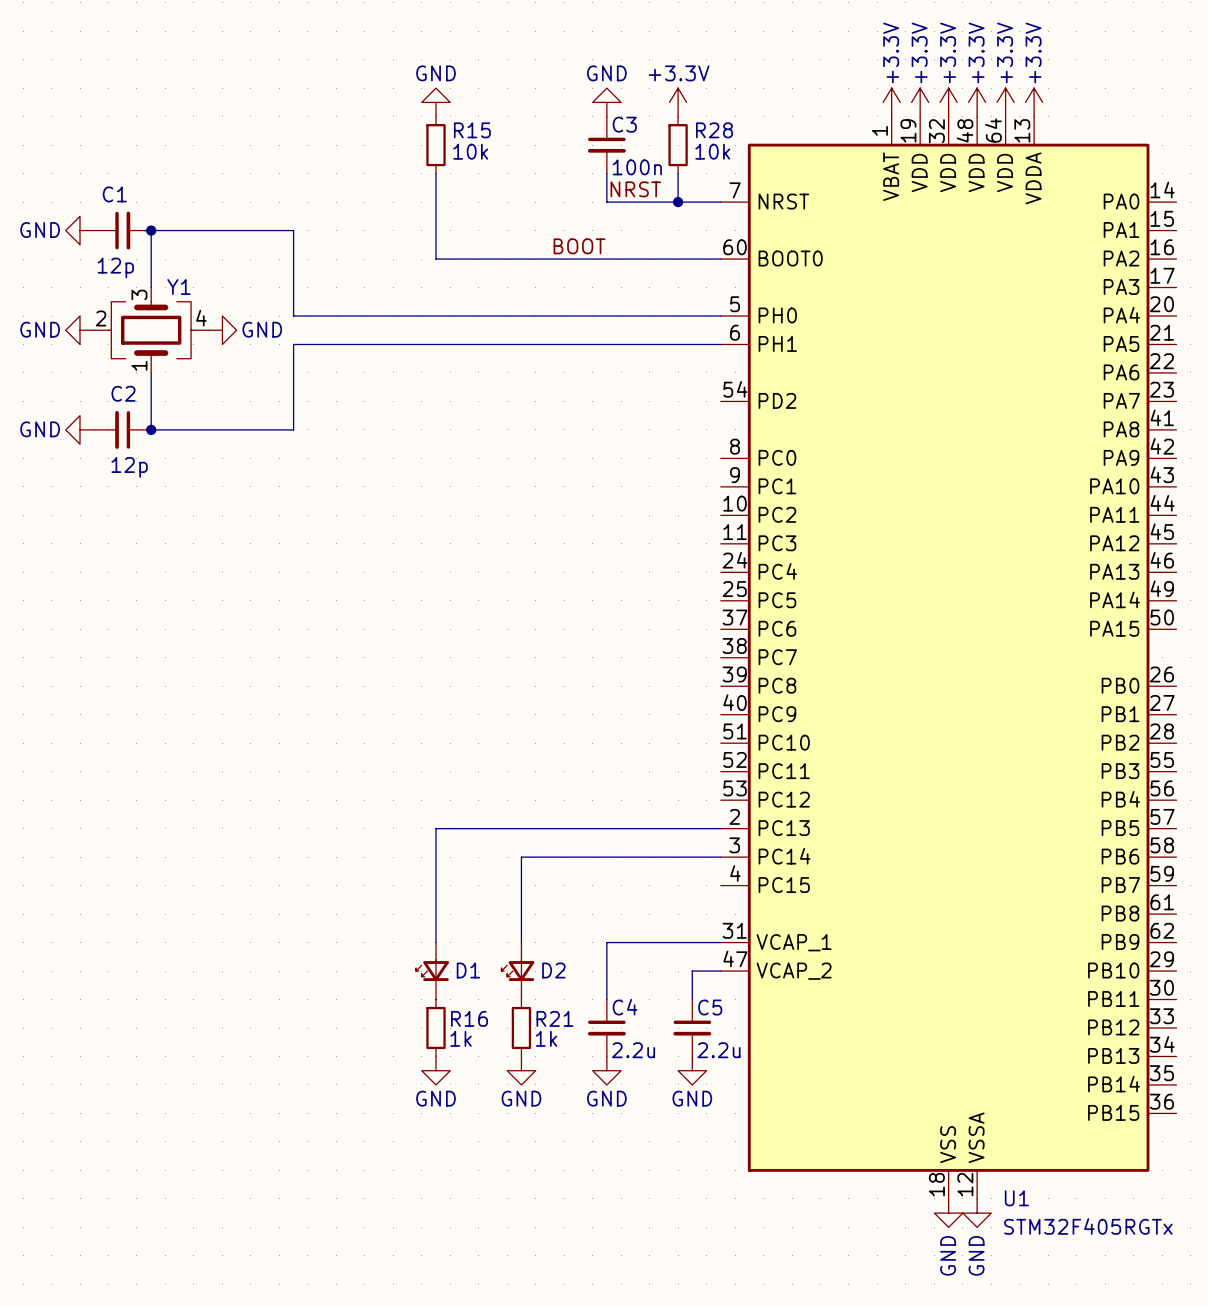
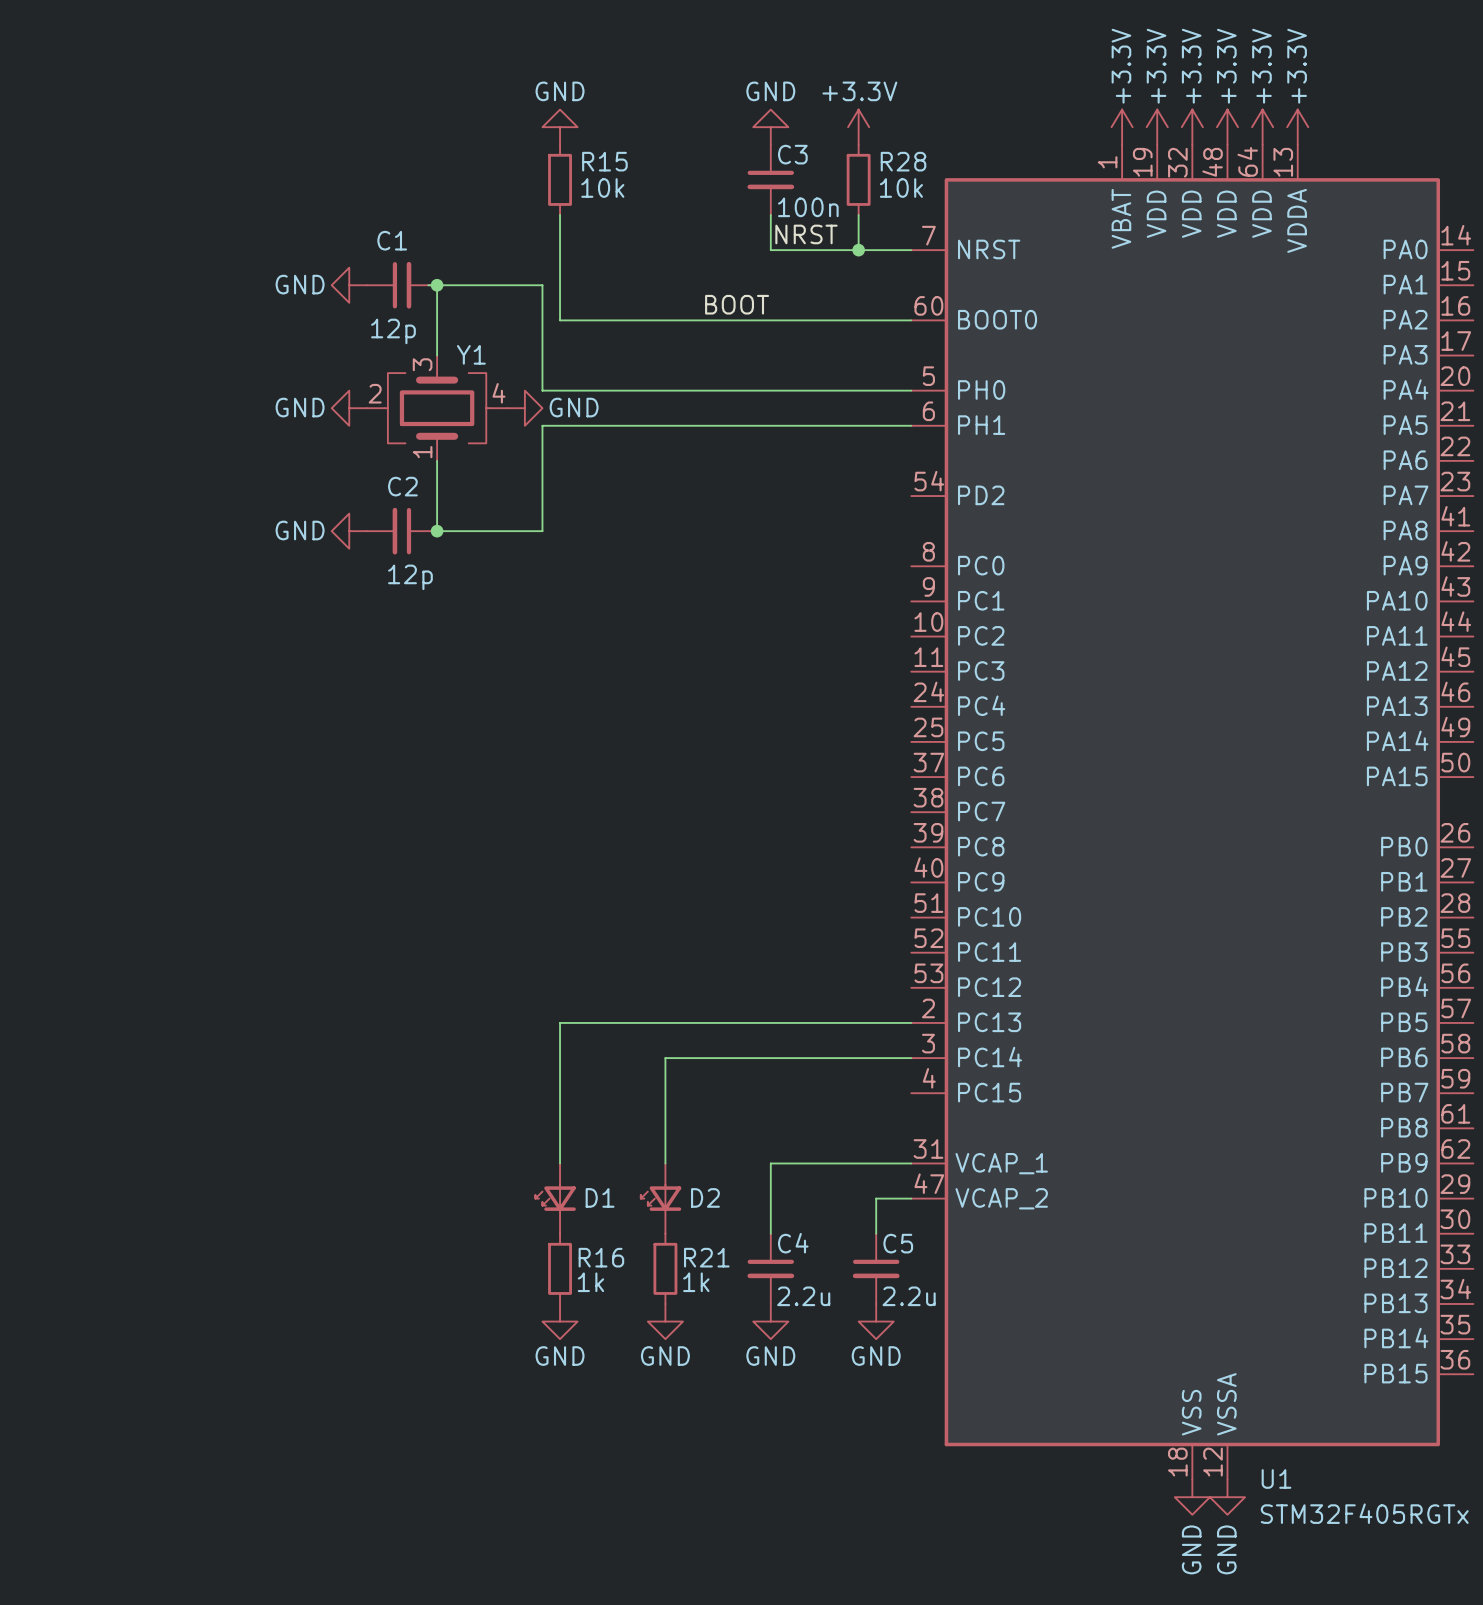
power symbol: GND (80, 230) -> none
C1 position: (122, 230) -> (401, 285)
wire: (144, 230) (293, 230) (293, 316) (421, 316) -> (428, 285) (542, 285) (542, 390)
wire: (151, 230) (151, 287) -> (437, 285) (437, 355)
junction: (151, 230) -> none
power symbol: none -> GND (349, 285)
junction: none -> (437, 285)
power symbol: GND (80, 330) -> none
Y1 position: (151, 330) -> (437, 408)
power symbol rotation: 0° (222, 330) -> 180° (349, 408)
power symbol position: GND (222, 330) -> GND (349, 408)
power symbol: none -> GND (524, 408)
wire: (421, 344) (293, 344) (293, 429) (151, 429) (151, 372) -> (542, 425) (542, 531) (437, 531) (437, 460)
power symbol: GND (80, 429) -> none
C2 position: (122, 429) -> (401, 531)
junction: (151, 429) -> none
power symbol: none -> GND (349, 531)
junction: none -> (437, 531)

